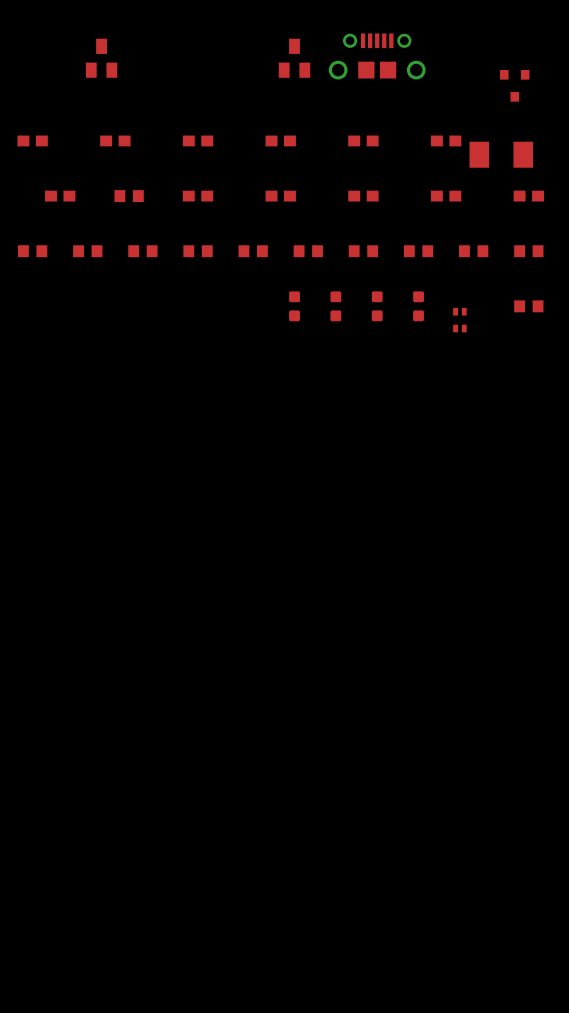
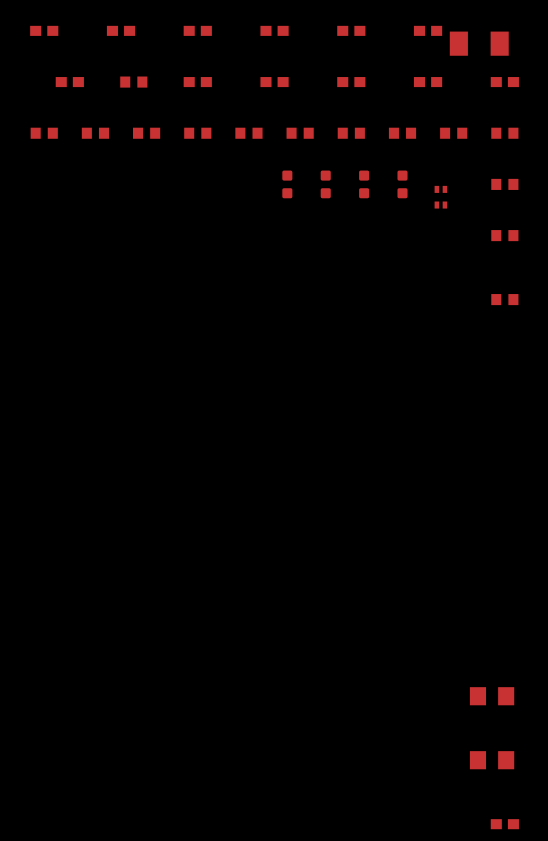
part: none -> (504, 235)
part: none -> (504, 299)
part: none -> (492, 696)
part: none -> (492, 760)
part: none -> (504, 824)

